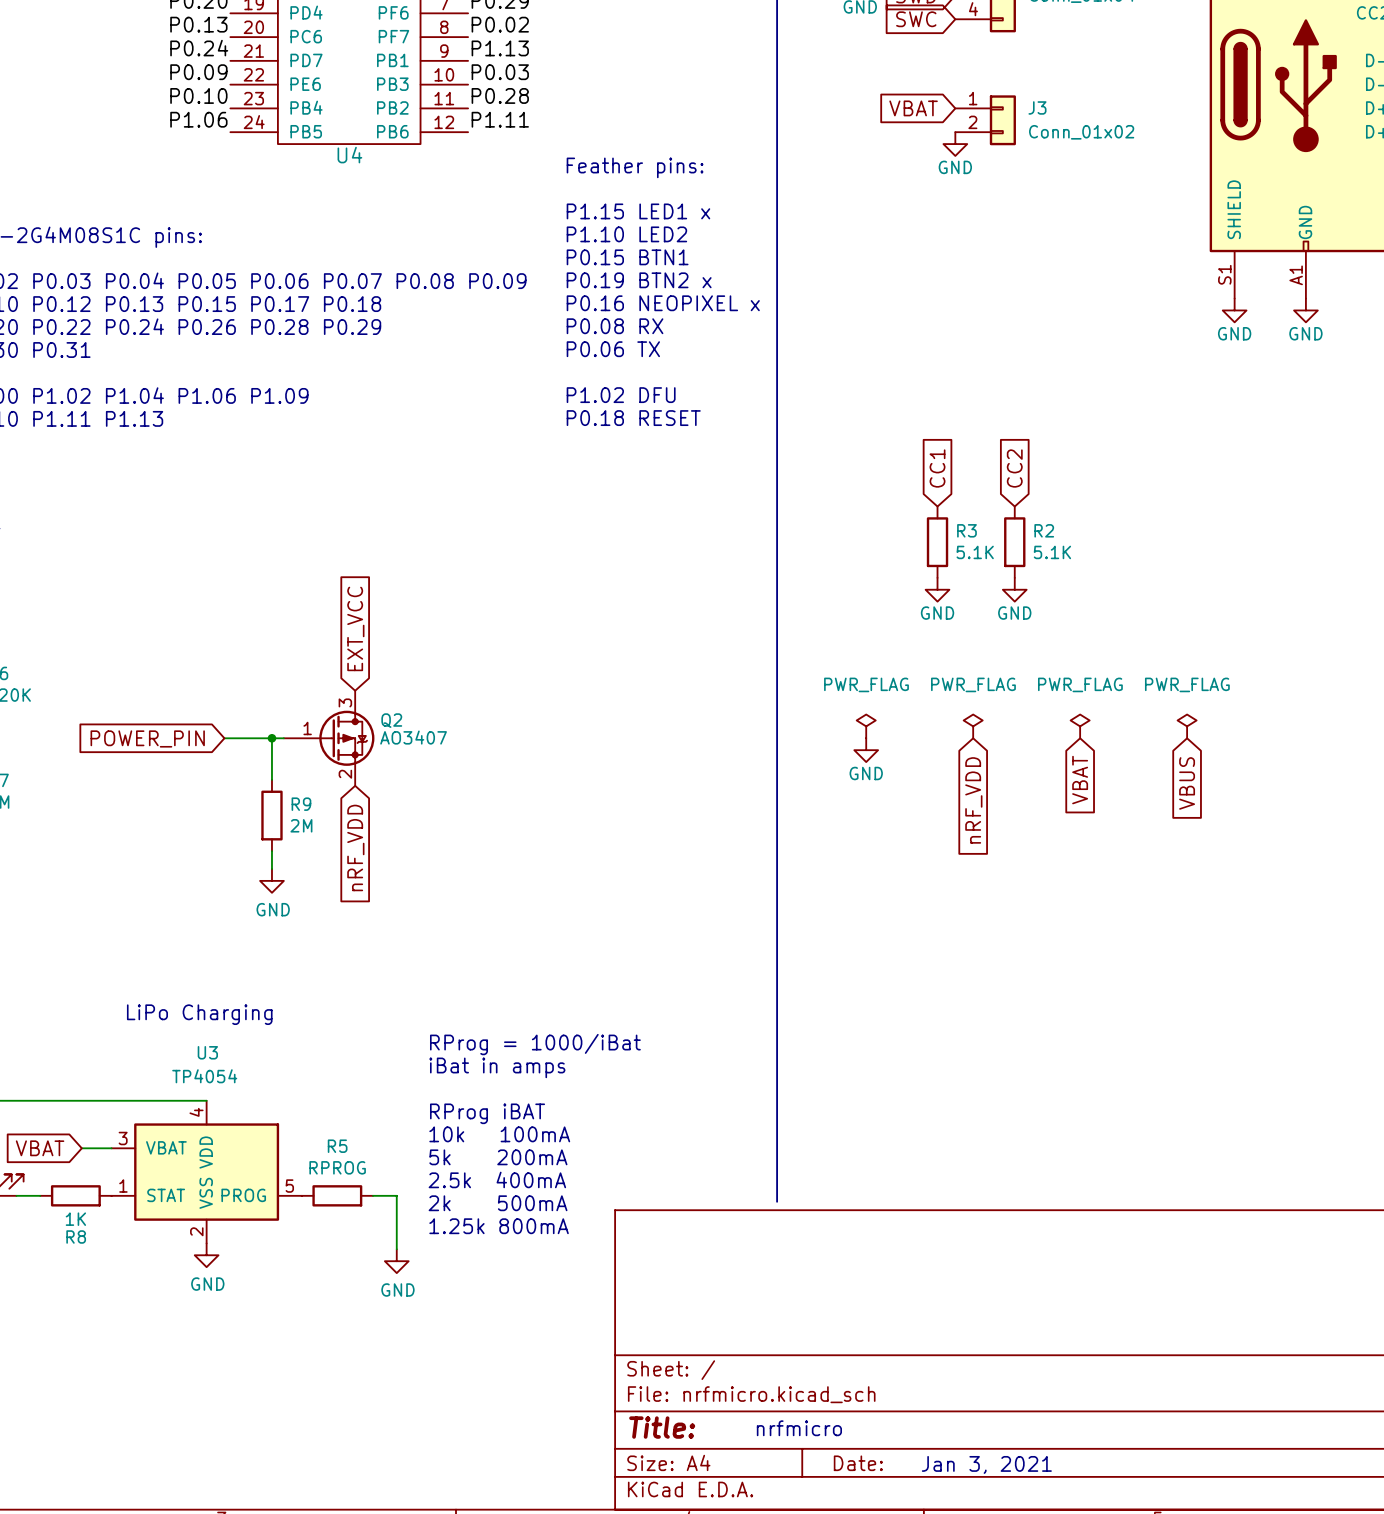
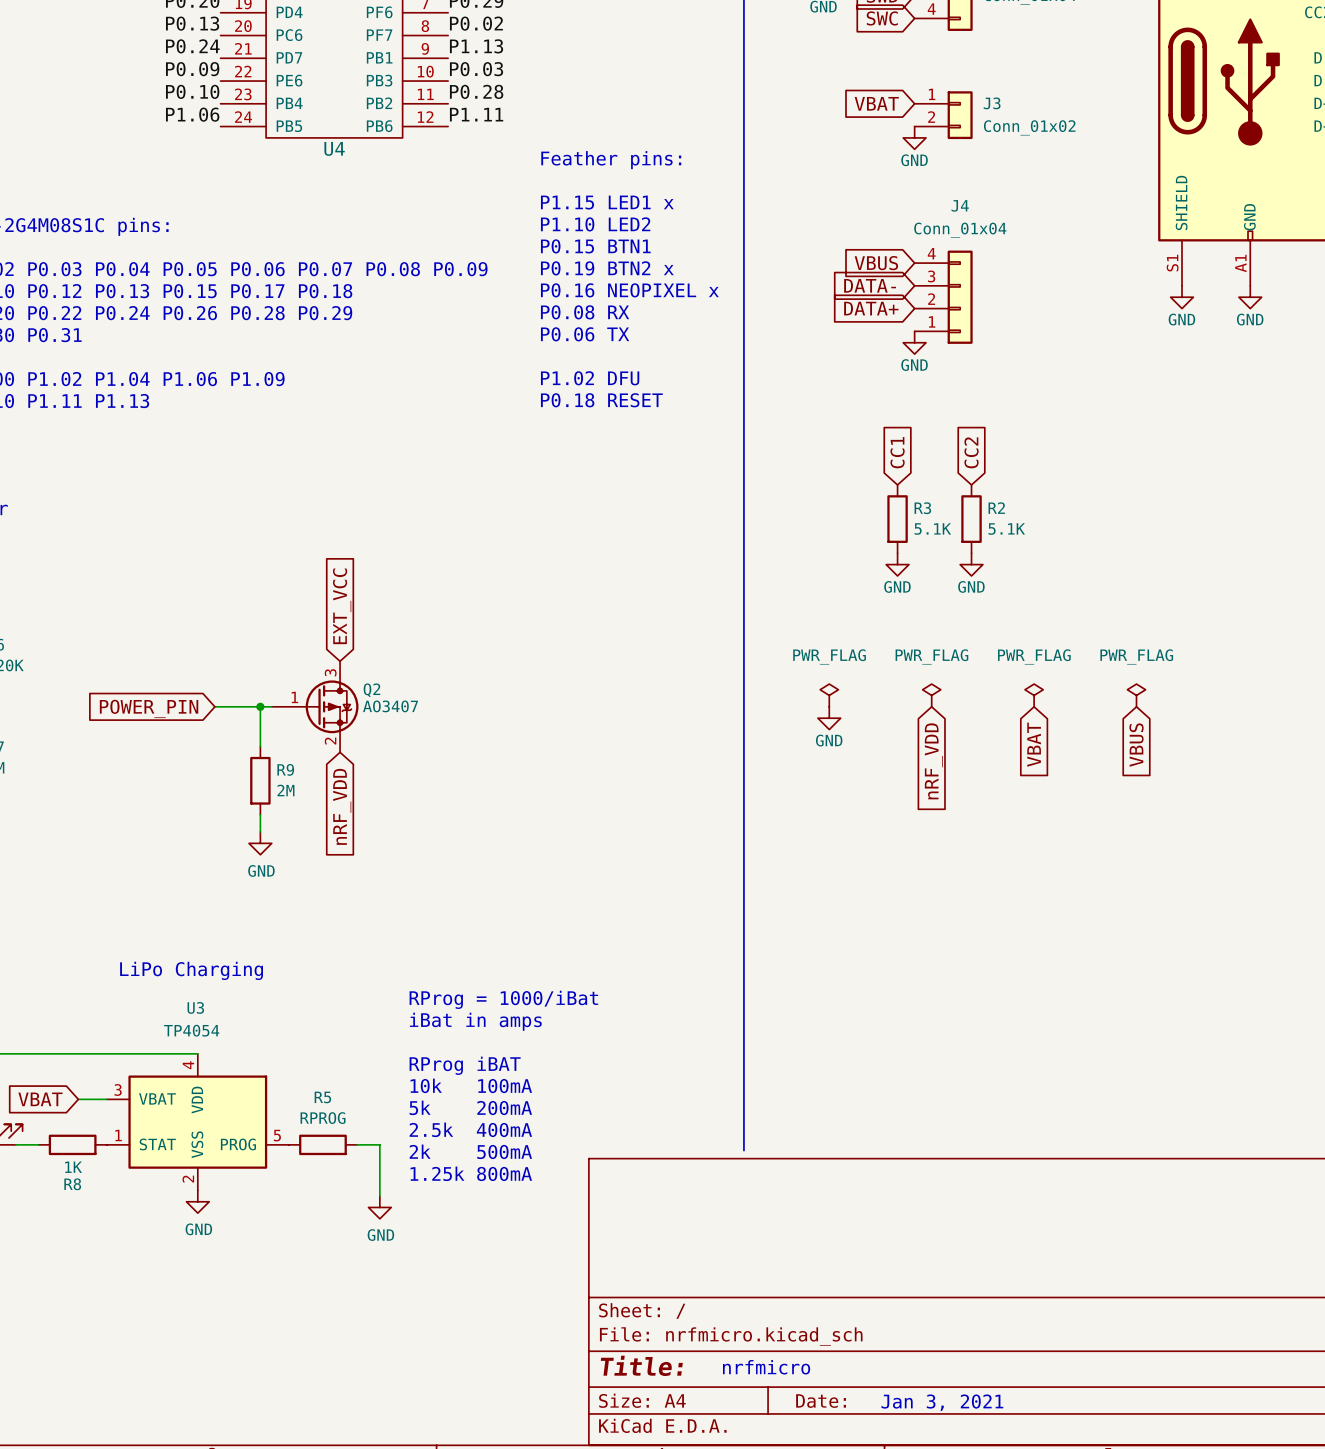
global label: none -> VBUS (876, 263)
global label: none -> DATA- (870, 285)
J4: none -> Conn_01x04 (943, 297)
global label: none -> DATA+ (871, 308)
power symbol: none -> GND (914, 342)

